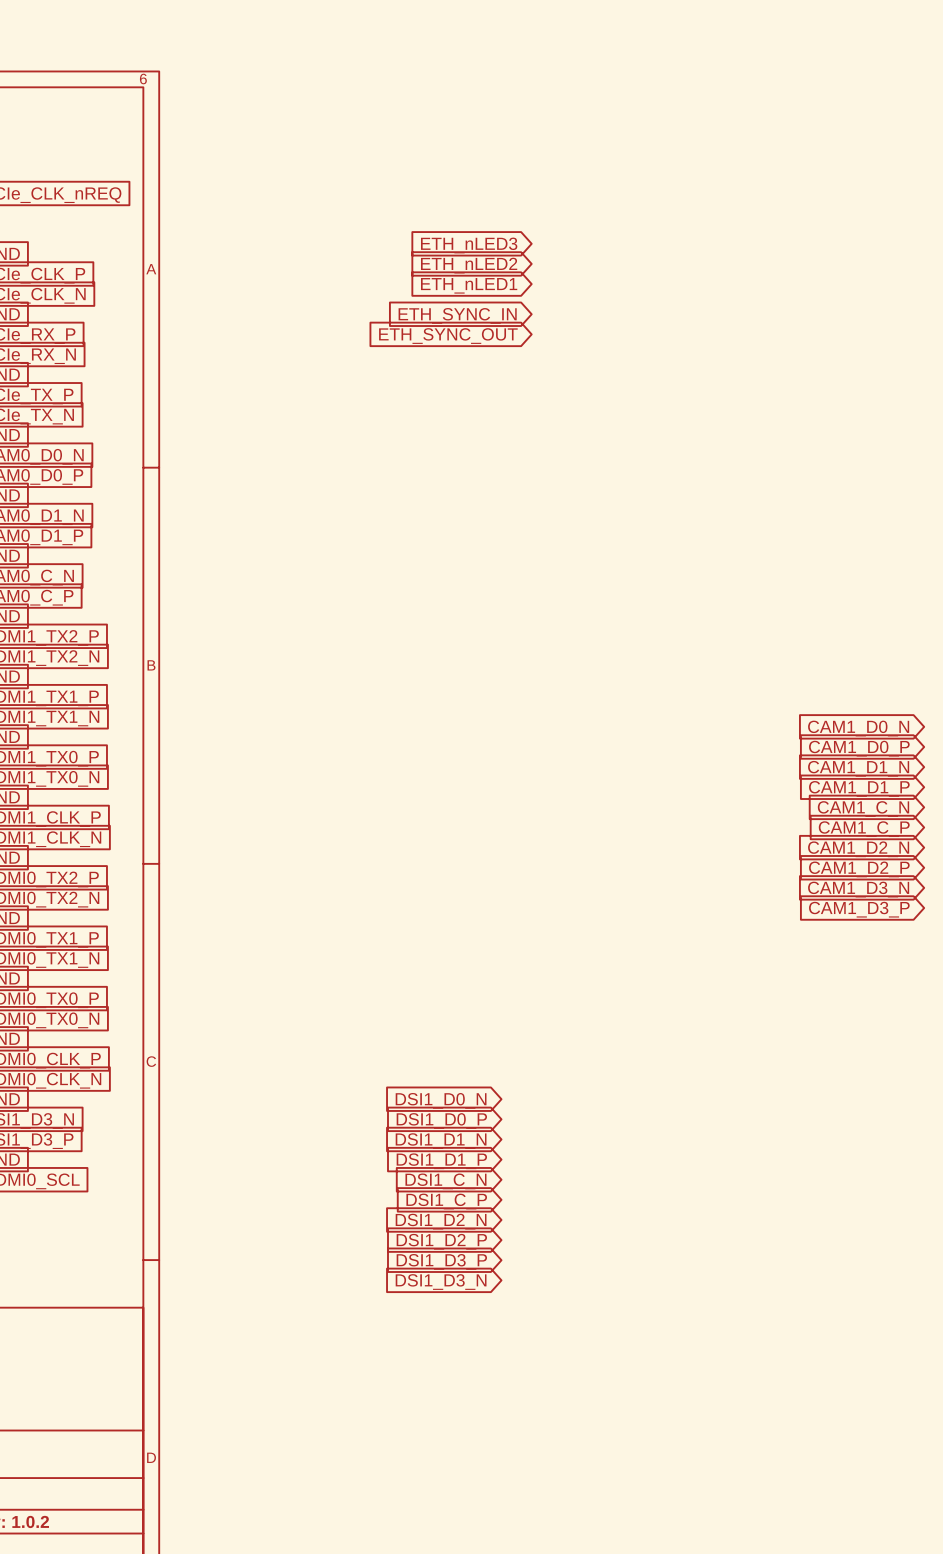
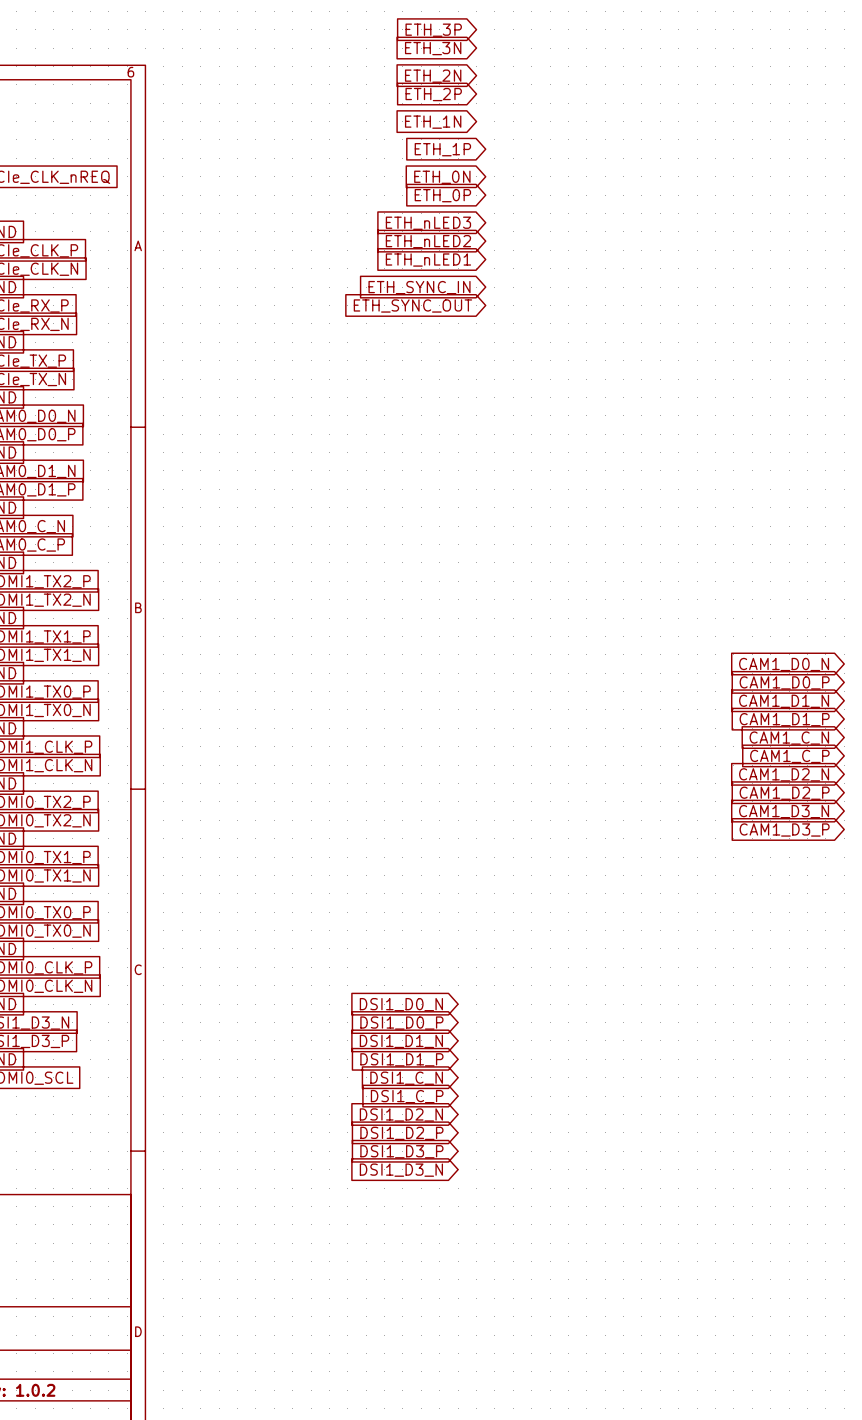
global label: none -> ETH_3P (433, 30)
global label: none -> ETH_3N (433, 48)
global label: none -> ETH_2N (433, 76)
global label: none -> ETH_2P (433, 94)
global label: none -> ETH_1N (433, 122)
global label: none -> ETH_1P (442, 149)
global label: none -> ETH_0N (442, 177)
global label: none -> ETH_0P (442, 195)

